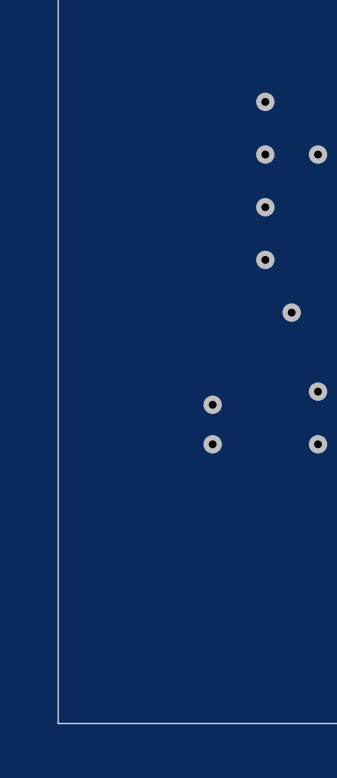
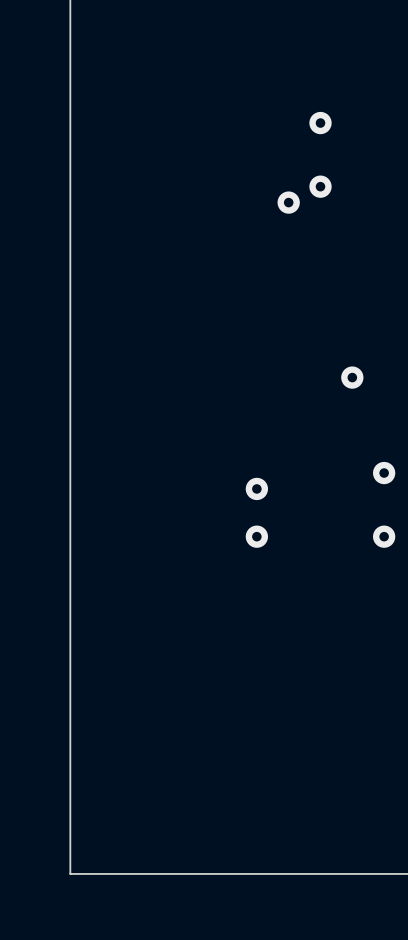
via: (318, 154) -> none
via: none -> (288, 202)
via: (265, 207) -> none
via: (265, 259) -> none

